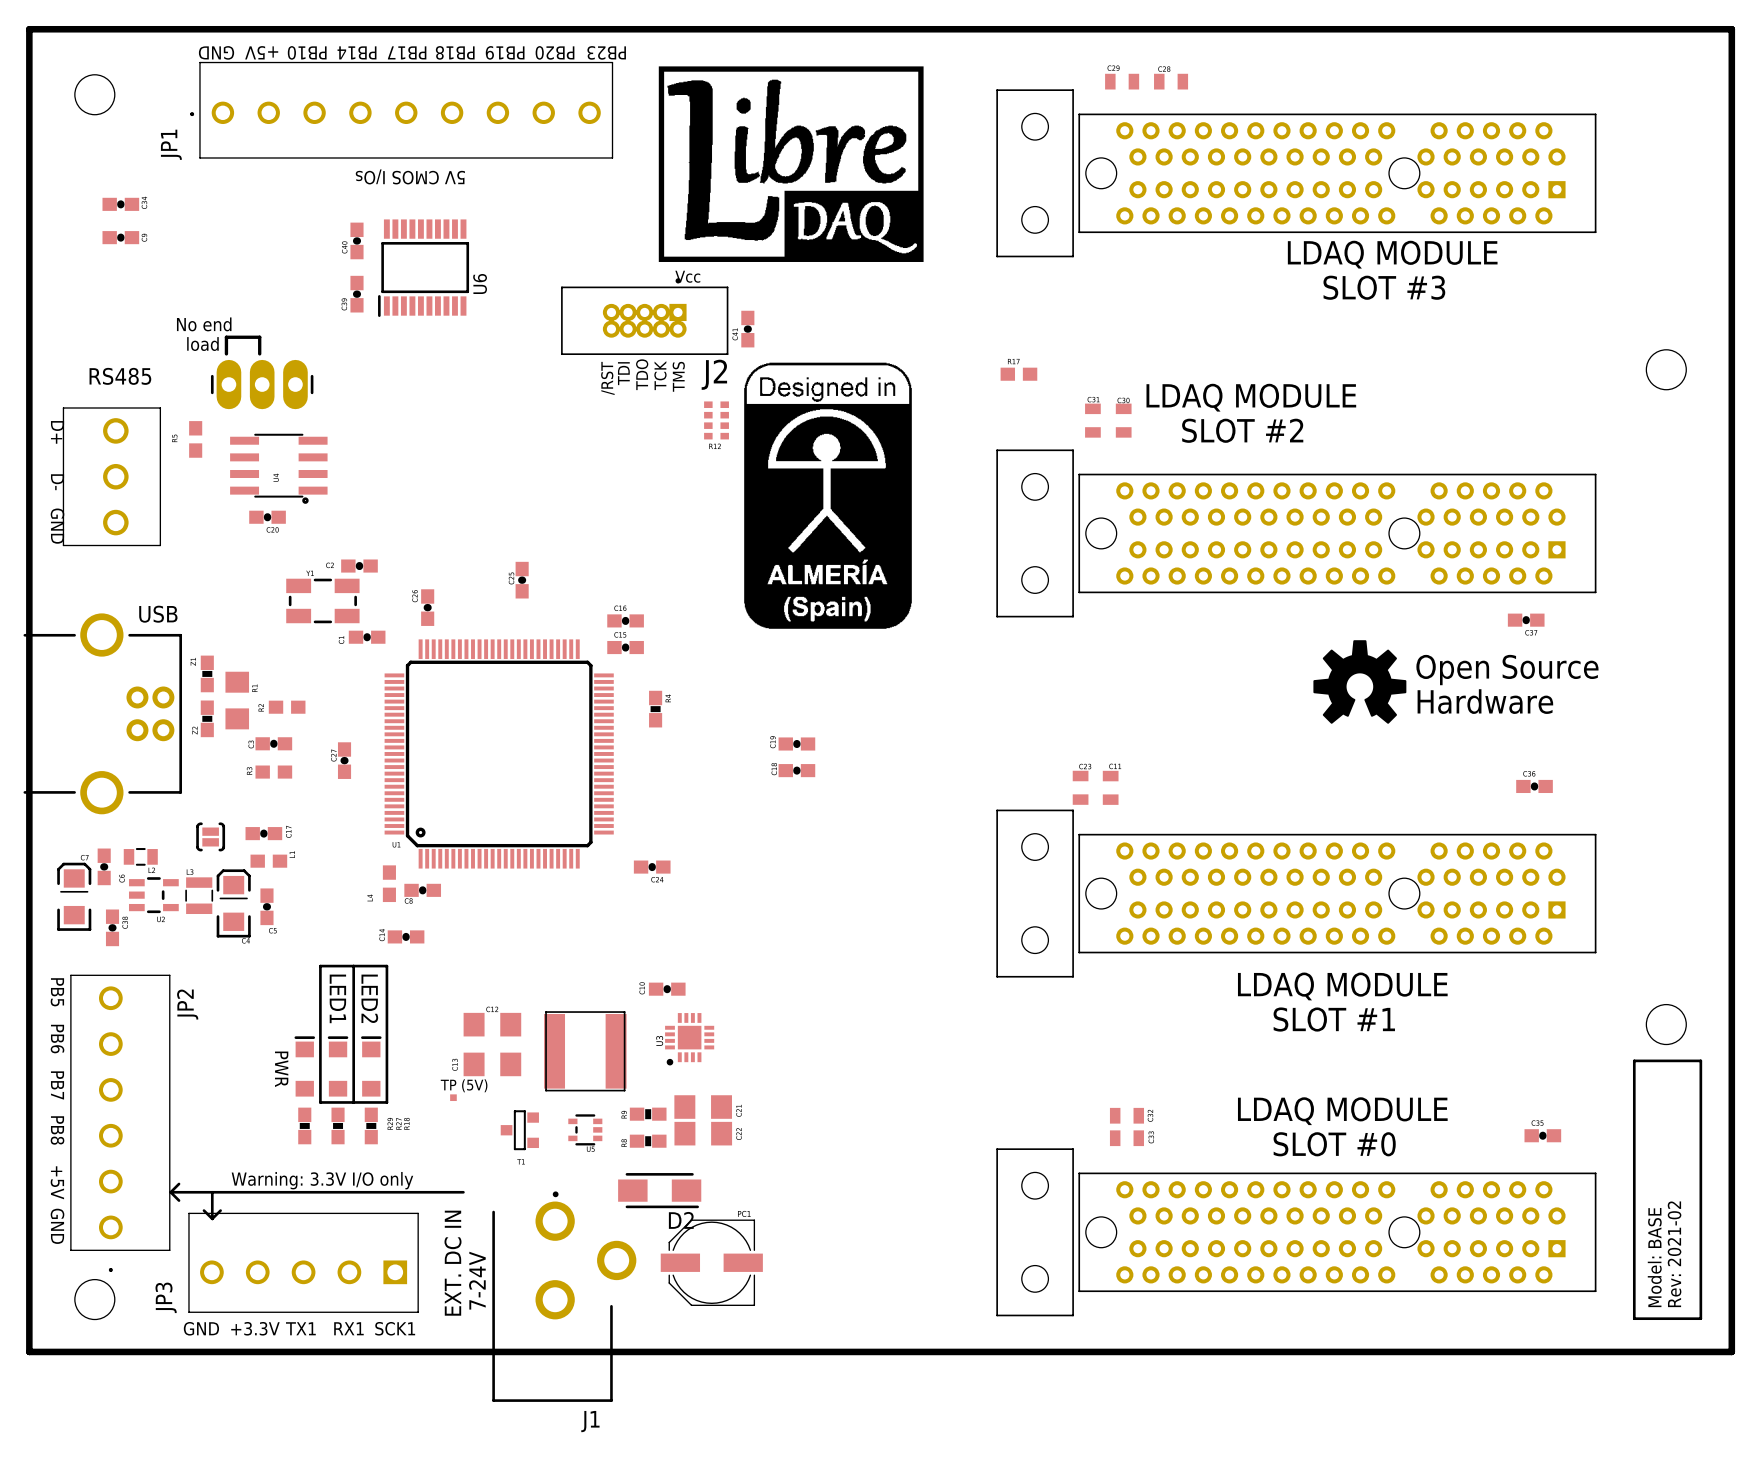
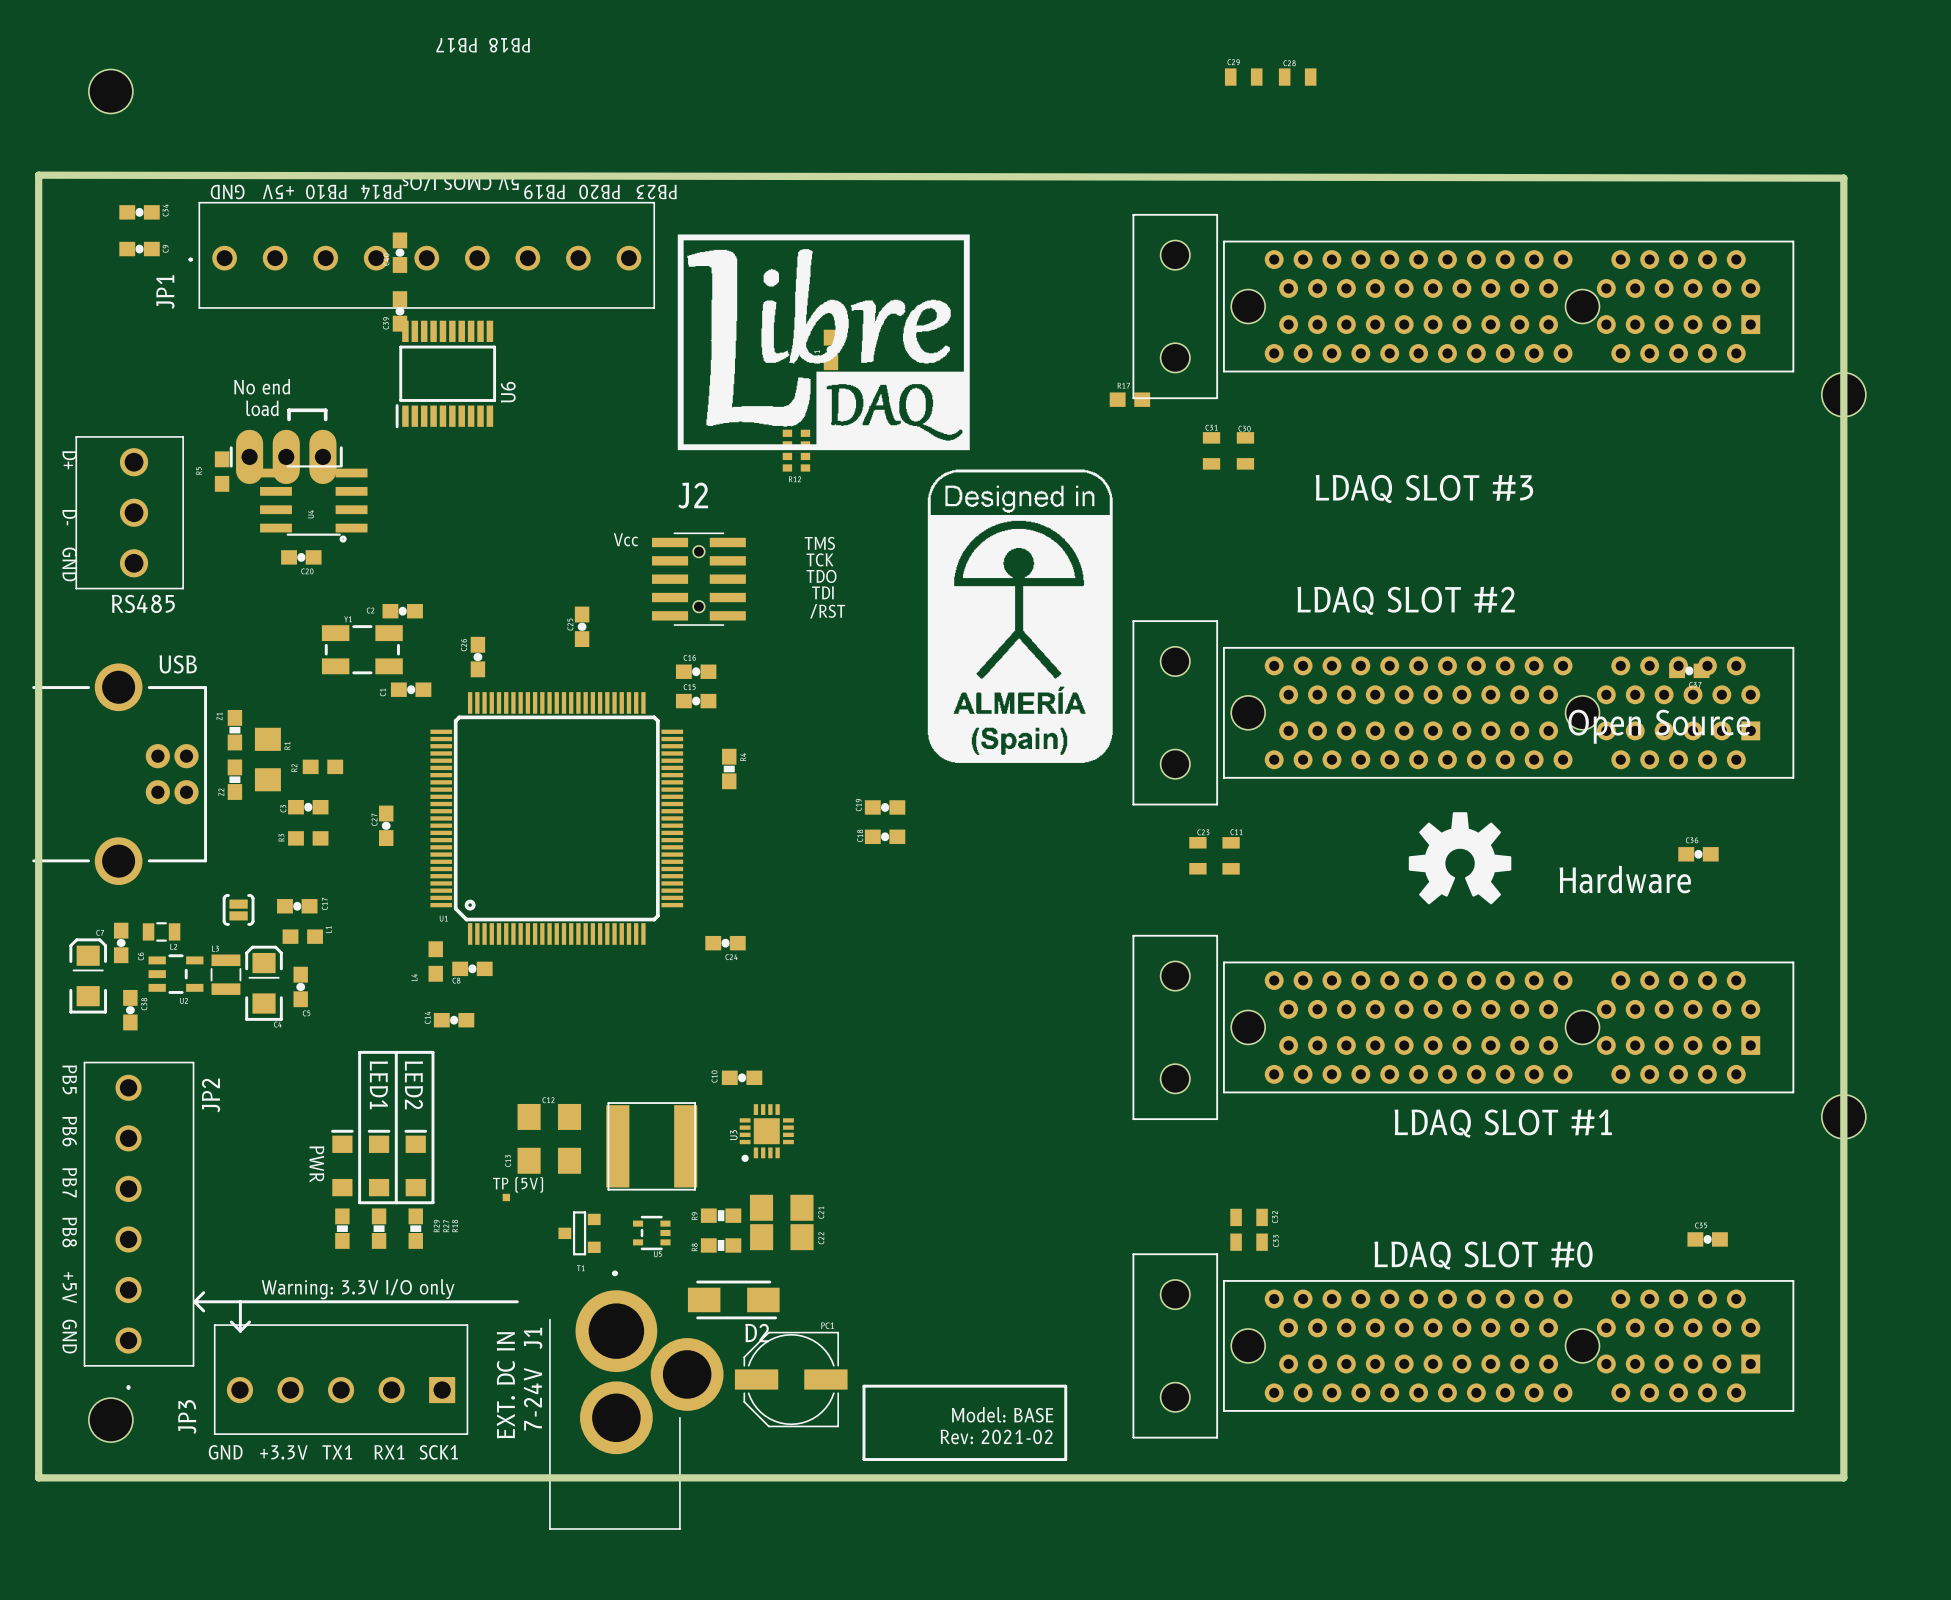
text position: GND (216, 52) -> GND (227, 191)
text position: +5V (261, 52) -> +5V (278, 191)
text position: PB10 (307, 52) -> PB10 (326, 191)
text position: PB14 (357, 52) -> PB14 (381, 192)
text position: PB19 (505, 52) -> PB19 (544, 191)
text position: PB20 (555, 52) -> PB20 (599, 191)
text position: PB23 (606, 52) -> PB23 (656, 192)
JP1 position: (401, 110) -> (421, 255)
drawing position: (791, 164) -> (823, 342)
board edge: (29, 170) (29, 29) (1731, 29) (1731, 1351) (1666, 1351) -> (38, 175) (1843, 178) (1843, 1477)
part position: (1296, 173) -> (1463, 306)
text: LDAQ MODULE (1392, 254) -> none
U6 position: (423, 268) -> (445, 374)
text position: Vcc (687, 276) -> Vcc (625, 539)
J2 footprint: [561, 278, 729, 356] -> [651, 532, 746, 626]
text: SLOT #3 (1384, 287) -> none
text position: No end (204, 324) -> No end (262, 386)
text position: load (202, 344) -> load (262, 408)
line: (226, 353) (226, 337) (259, 337) (259, 353) -> none
text rotation: 0° (623, 373) -> 90° clockwise (822, 592)
text position: TDI (623, 373) -> TDI (822, 592)
text rotation: 0° (642, 374) -> 90° clockwise (821, 576)
text position: TDO (642, 374) -> TDO (821, 576)
J2 name position: J2 (714, 374) -> J2 (693, 495)
text rotation: 0° (660, 375) -> 90° clockwise (820, 559)
text position: TCK (660, 375) -> TCK (820, 559)
text position: RS485 (120, 376) -> RS485 (143, 603)
text rotation: 0° (678, 376) -> 90° clockwise (819, 543)
text position: TMS (678, 376) -> TMS (819, 543)
text rotation: 0° (607, 378) -> 90° clockwise (827, 611)
text position: /RST (607, 378) -> /RST (827, 611)
part position: (262, 384) -> (286, 456)
line: none -> (289, 419) (289, 410) (325, 410) (325, 419)
text: LDAQ MODULE (1251, 397) -> none
text: SLOT #2 (1242, 430) -> LDAQ SLOT #3 (1424, 488)
drawing position: (828, 495) -> (1020, 616)
part: (1296, 533) -> none
text: none -> LDAQ SLOT #2 (1406, 600)
part: none -> (1463, 712)
drawing position: (1359, 681) -> (1460, 858)
text position: Hardware (1485, 701) -> Hardware (1625, 879)
part position: (1296, 893) -> (1463, 1027)
text: LDAQ MODULE (1342, 986) -> none
text: SLOT #1 (1334, 1019) -> LDAQ SLOT #1 (1503, 1123)
line: (1634, 1060) (1634, 1318) (1700, 1318) (1700, 1060) (1634, 1060) -> none
text: LDAQ MODULE (1342, 1111) -> none
text: SLOT #0 (1334, 1144) -> LDAQ SLOT #0 (1483, 1255)
J1 footprint: [492, 1191, 637, 1402] -> [549, 1270, 724, 1530]
part position: (1296, 1232) -> (1463, 1345)
text: Rev: 2021-02 (1674, 1254) -> none
text: Model: BASE (1654, 1257) -> none
line: none -> (863, 1386) (863, 1459) (1065, 1459) (1065, 1386) (863, 1386)
text: none -> Model: BASE (1002, 1414)
text: none -> Rev: 2021-02 (996, 1436)
J1 name position: J1 (590, 1421) -> J1 (533, 1338)

